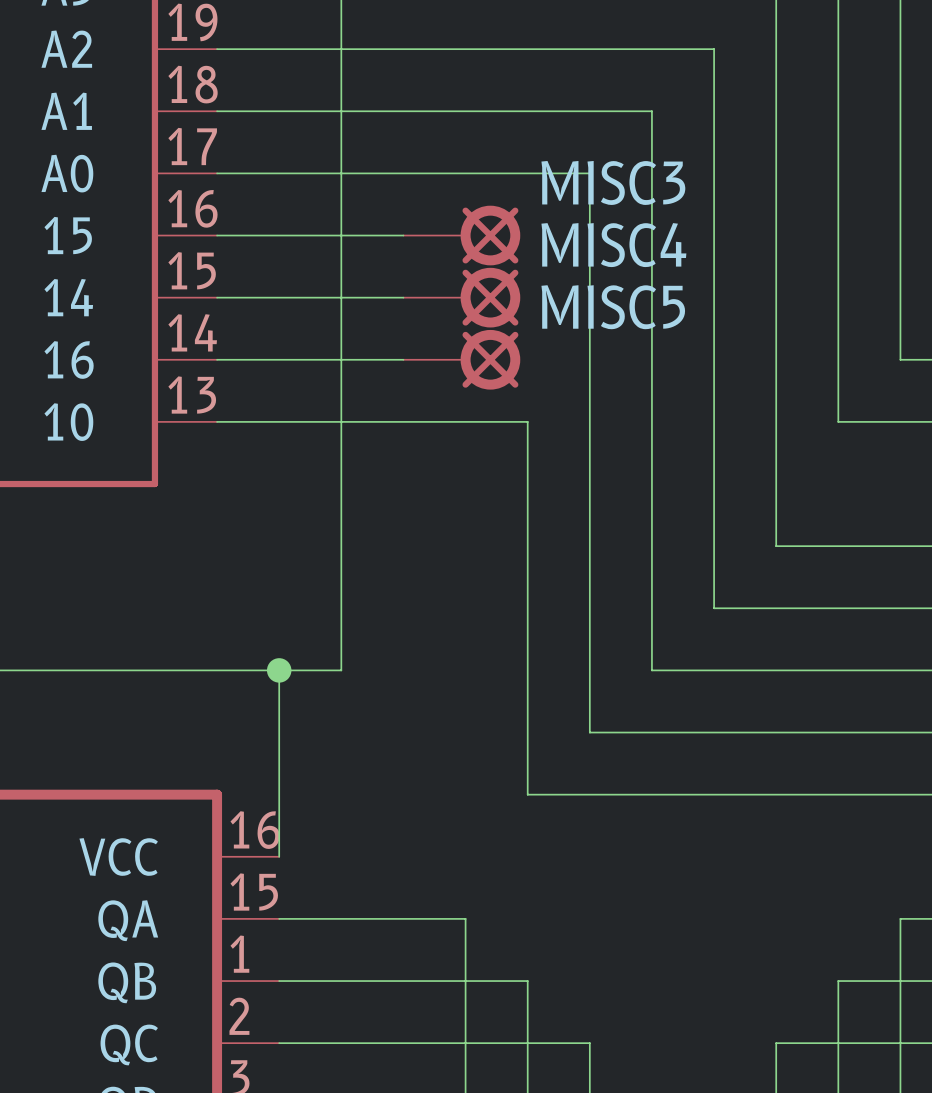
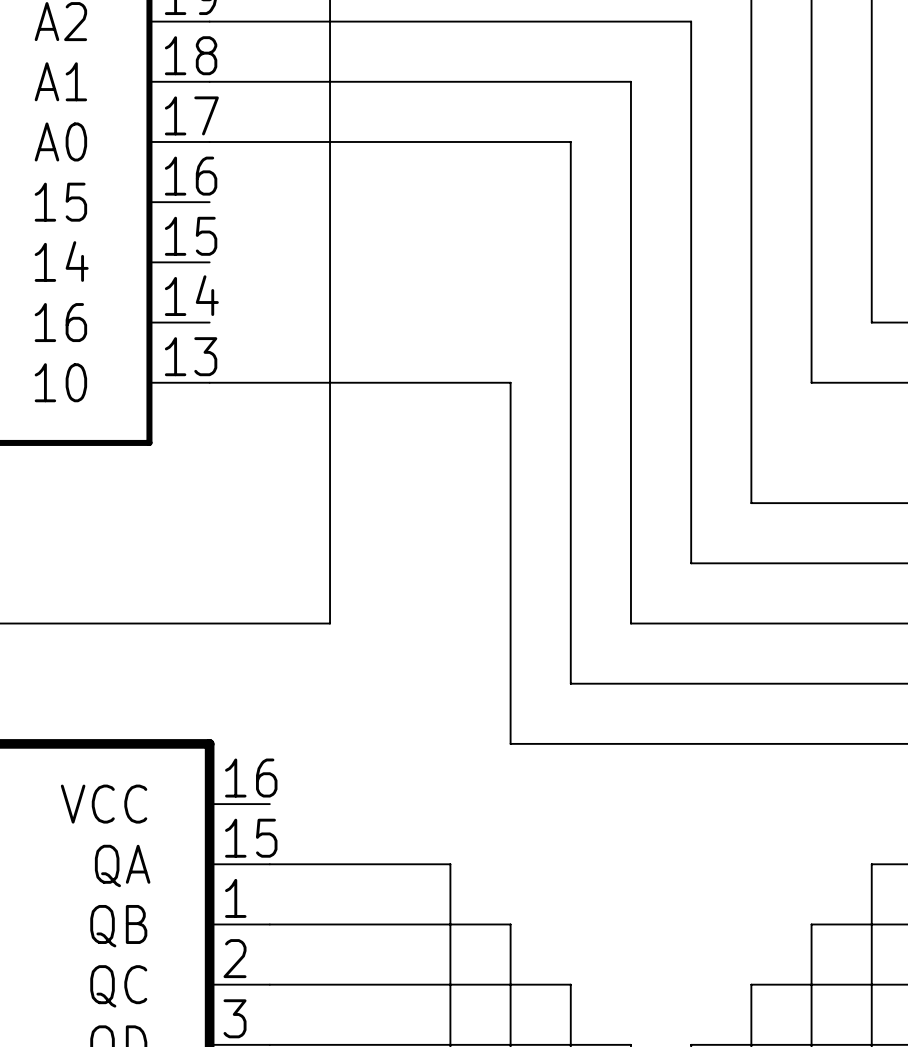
wire: (217, 235) (403, 235) -> none
MISC3: (461, 235) -> none
wire: (217, 297) (403, 297) -> none
MISC4: (461, 297) -> none
wire: (217, 359) (403, 359) -> none
MISC5: (461, 359) -> none
wire: (279, 670) (279, 856) -> none
junction: (279, 670) -> none

